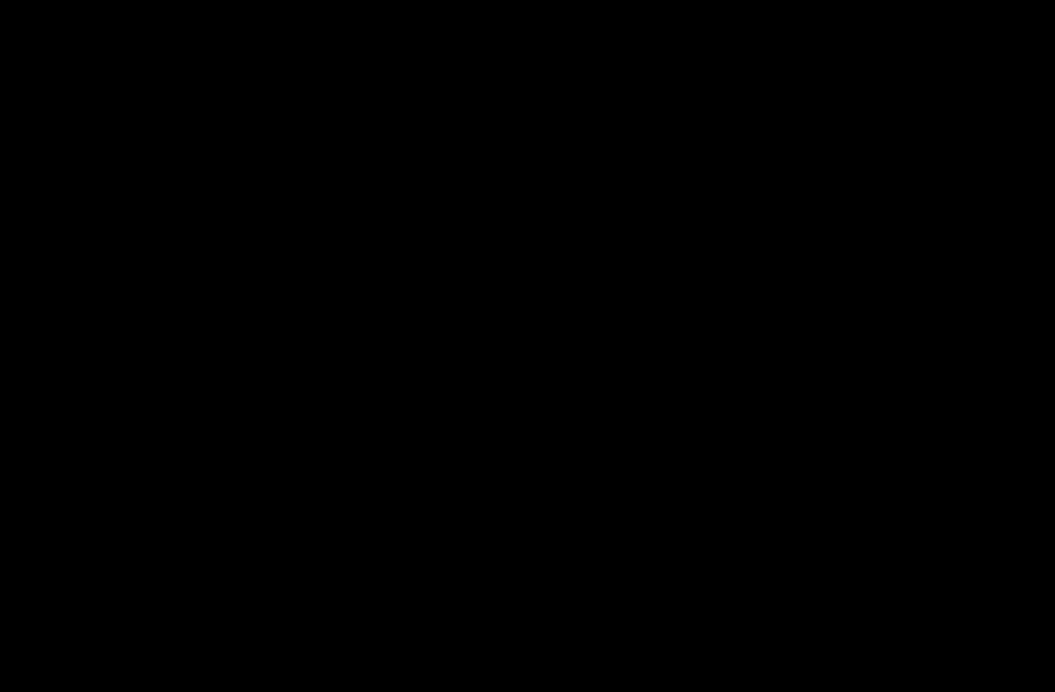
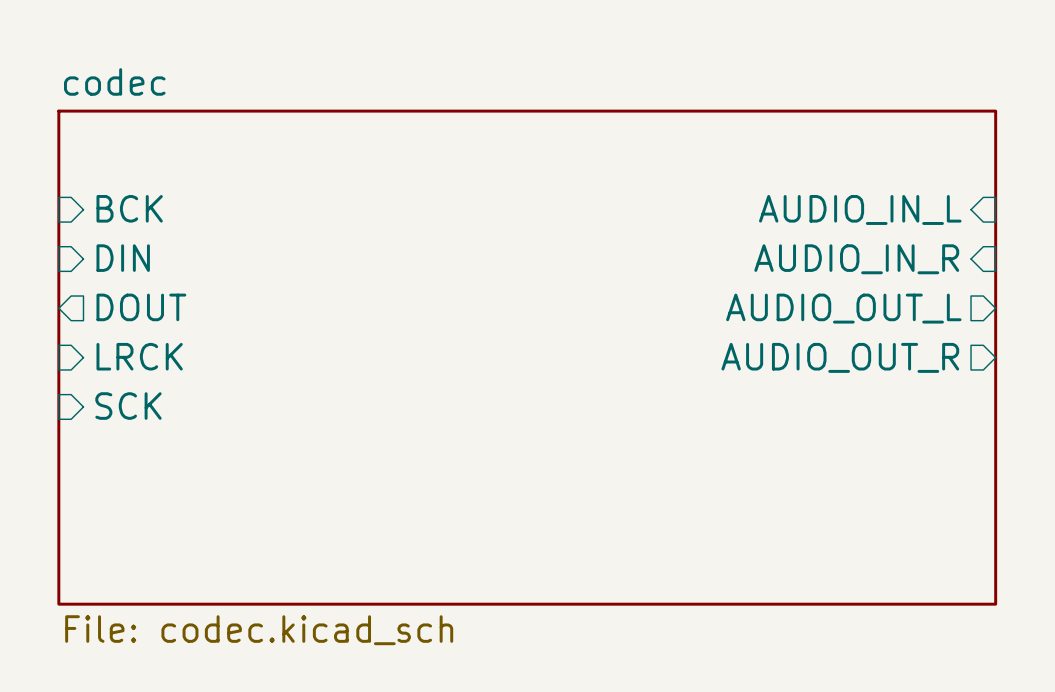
sheet pin: none -> BCK (129, 208)
sheet pin: none -> AUDIO_IN_L (860, 209)
sheet pin: none -> DIN (123, 258)
sheet pin: none -> AUDIO_IN_R (856, 259)
sheet pin: none -> DOUT (141, 307)
sheet pin: none -> AUDIO_OUT_L (843, 308)
sheet pin: none -> LRCK (139, 356)
sheet codec: none -> File: codec.kicad_sch (527, 357)
sheet pin: none -> AUDIO_OUT_R (840, 357)
sheet pin: none -> SCK (128, 406)

